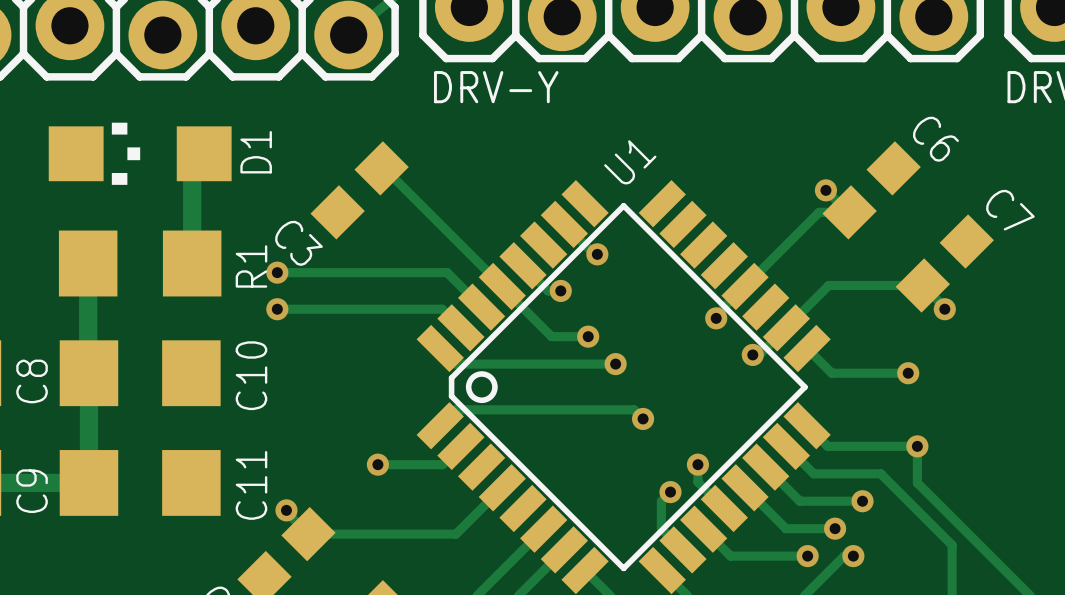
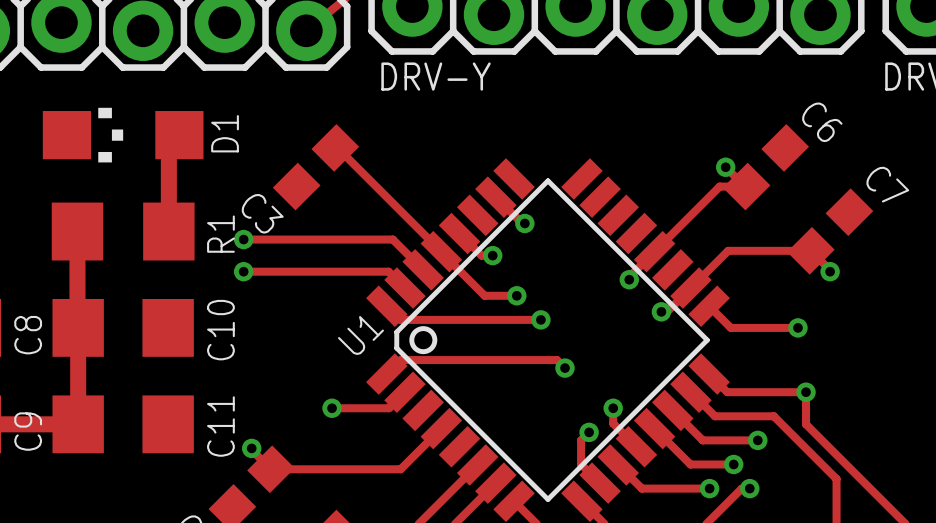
U1 name position: U1 (630, 162) -> U1 (360, 335)

